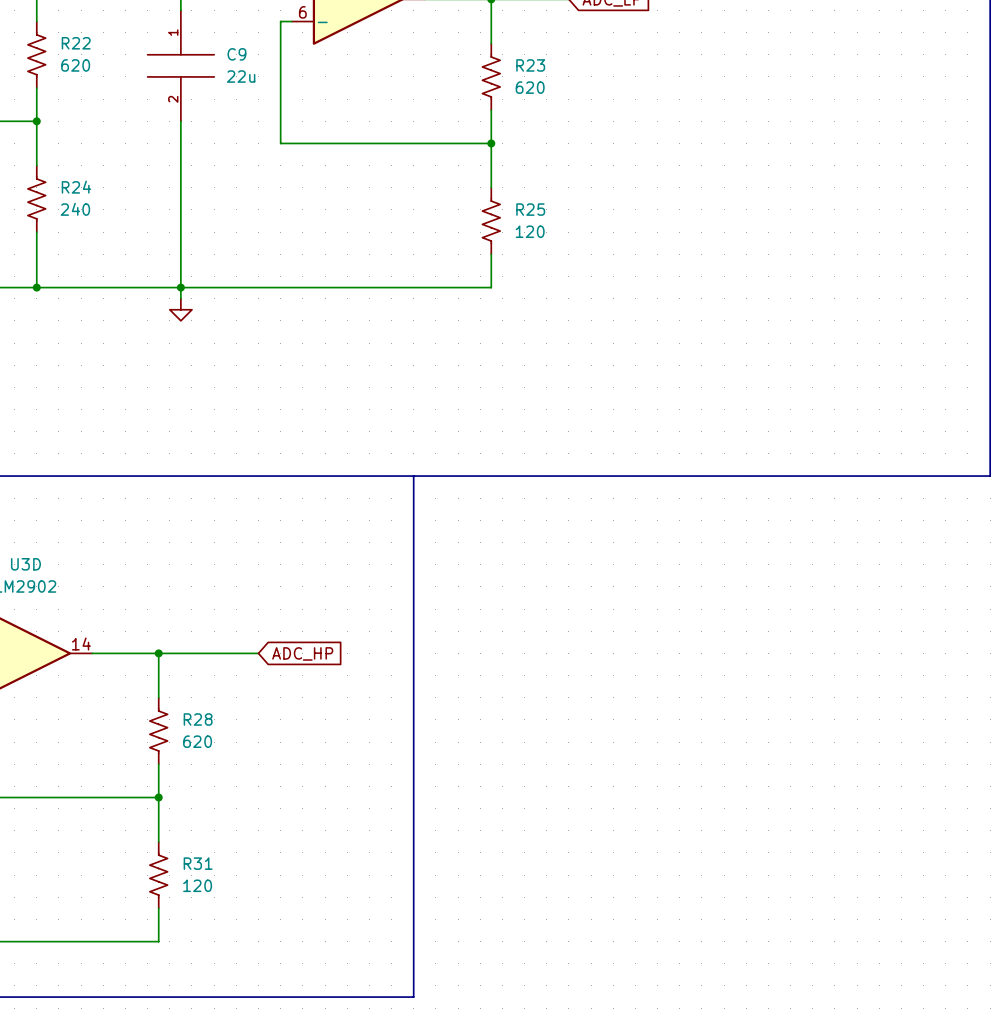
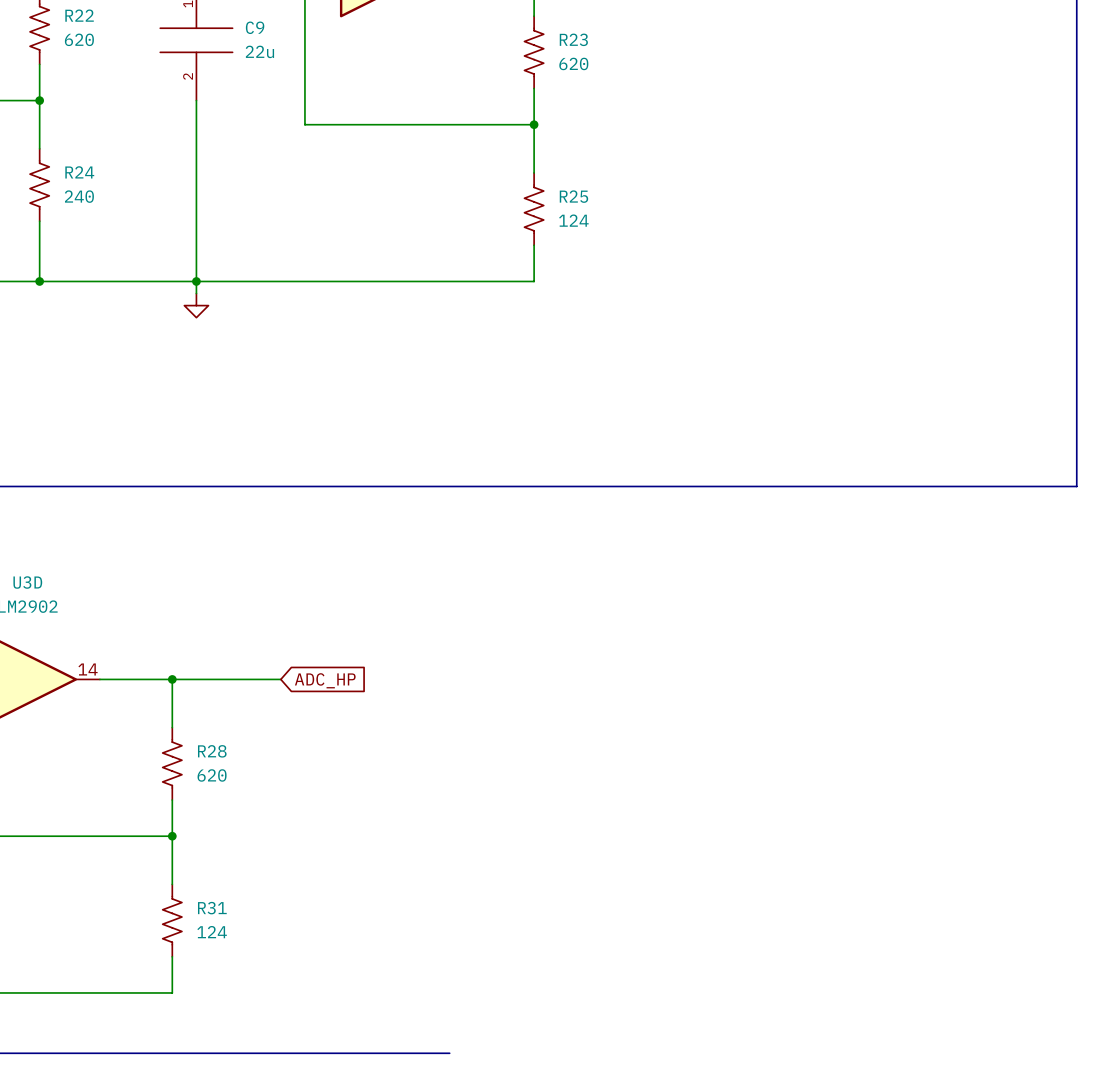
R25 value: 120 (530, 231) -> 124 (573, 220)
line: (413, 476) (413, 997) -> none
R31 value: 120 (197, 885) -> 124 (212, 932)

